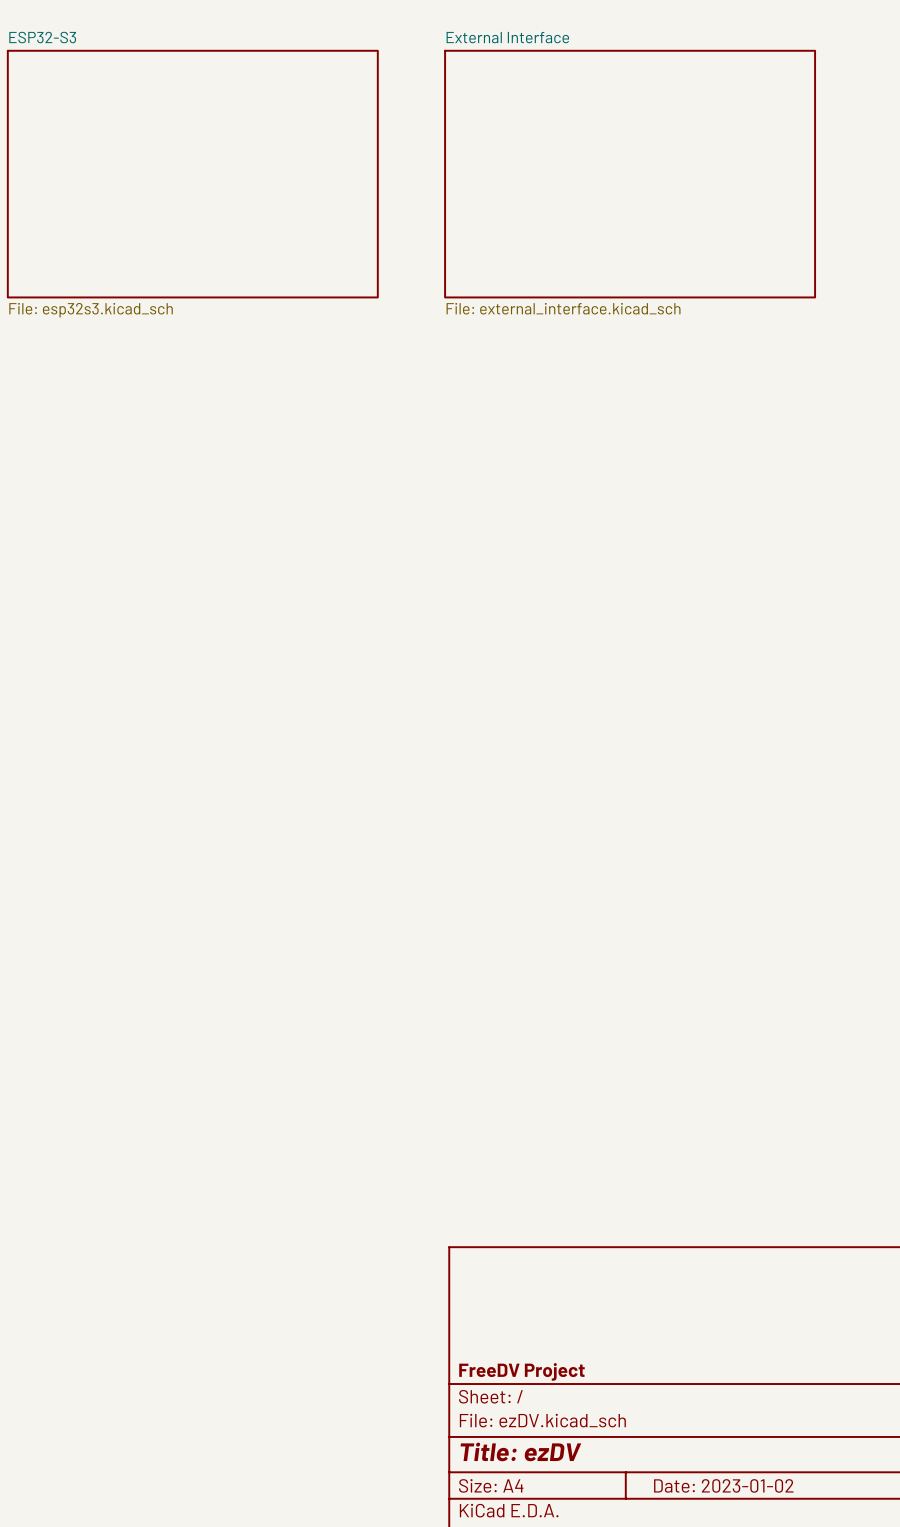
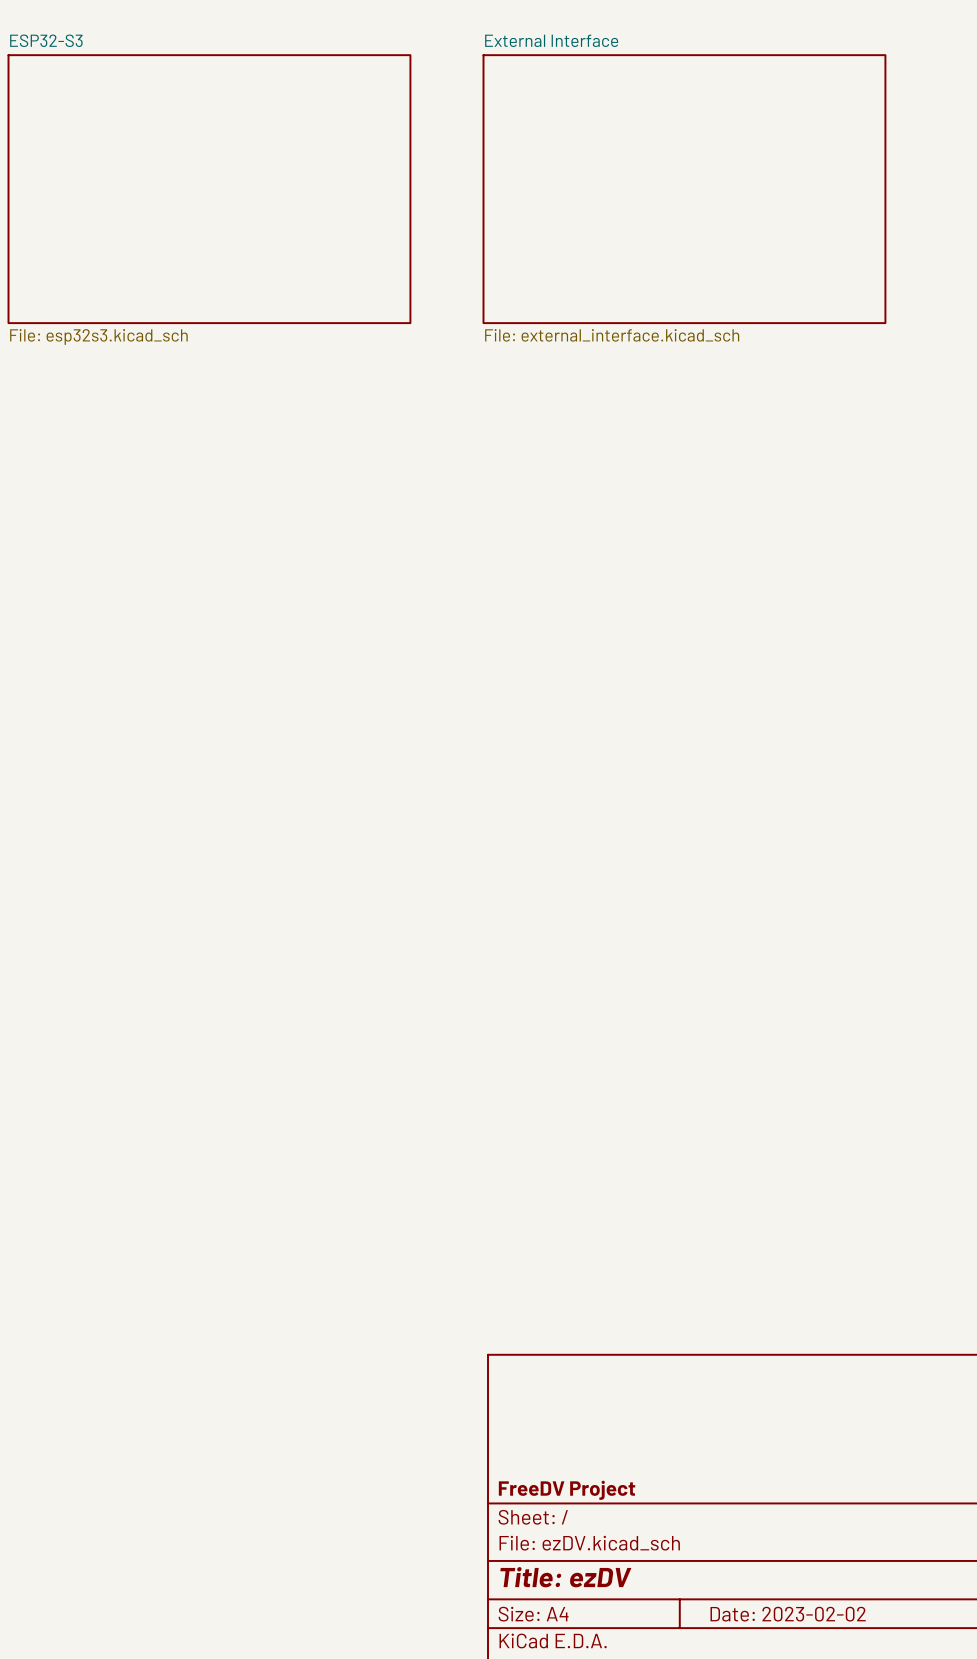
title block: Date: 2023-01-02 (723, 1485) -> Date: 2023-02-02 (788, 1614)

